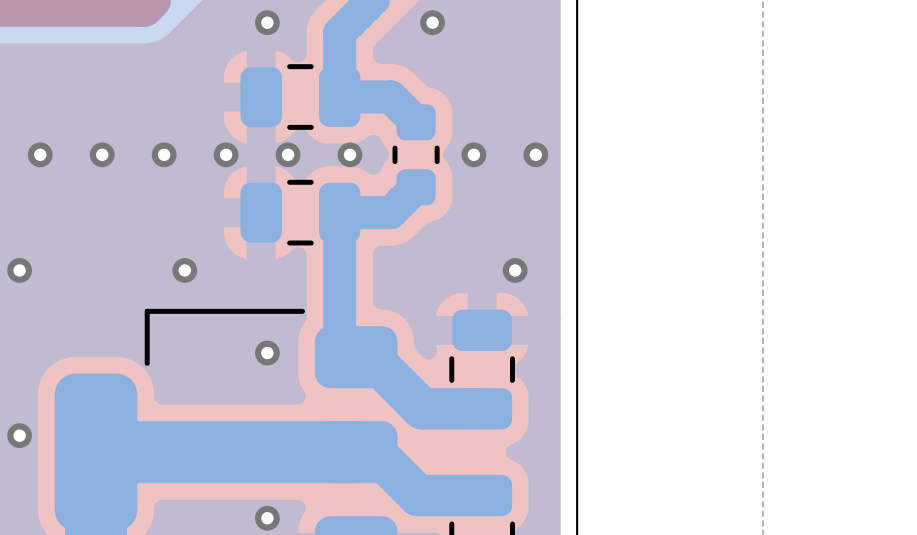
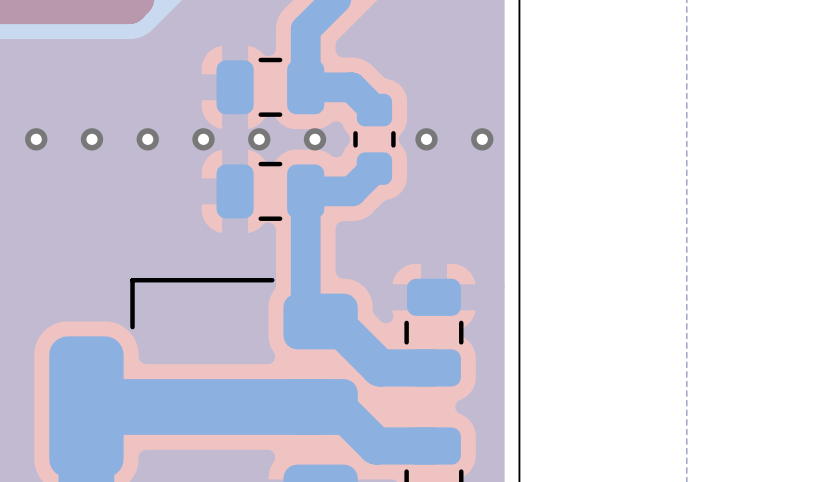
via: (267, 22) -> none
via: (432, 22) -> none
via: (19, 270) -> none
via: (184, 270) -> none
via: (515, 270) -> none
via: (267, 353) -> none
via: (19, 435) -> none
via: (267, 518) -> none

